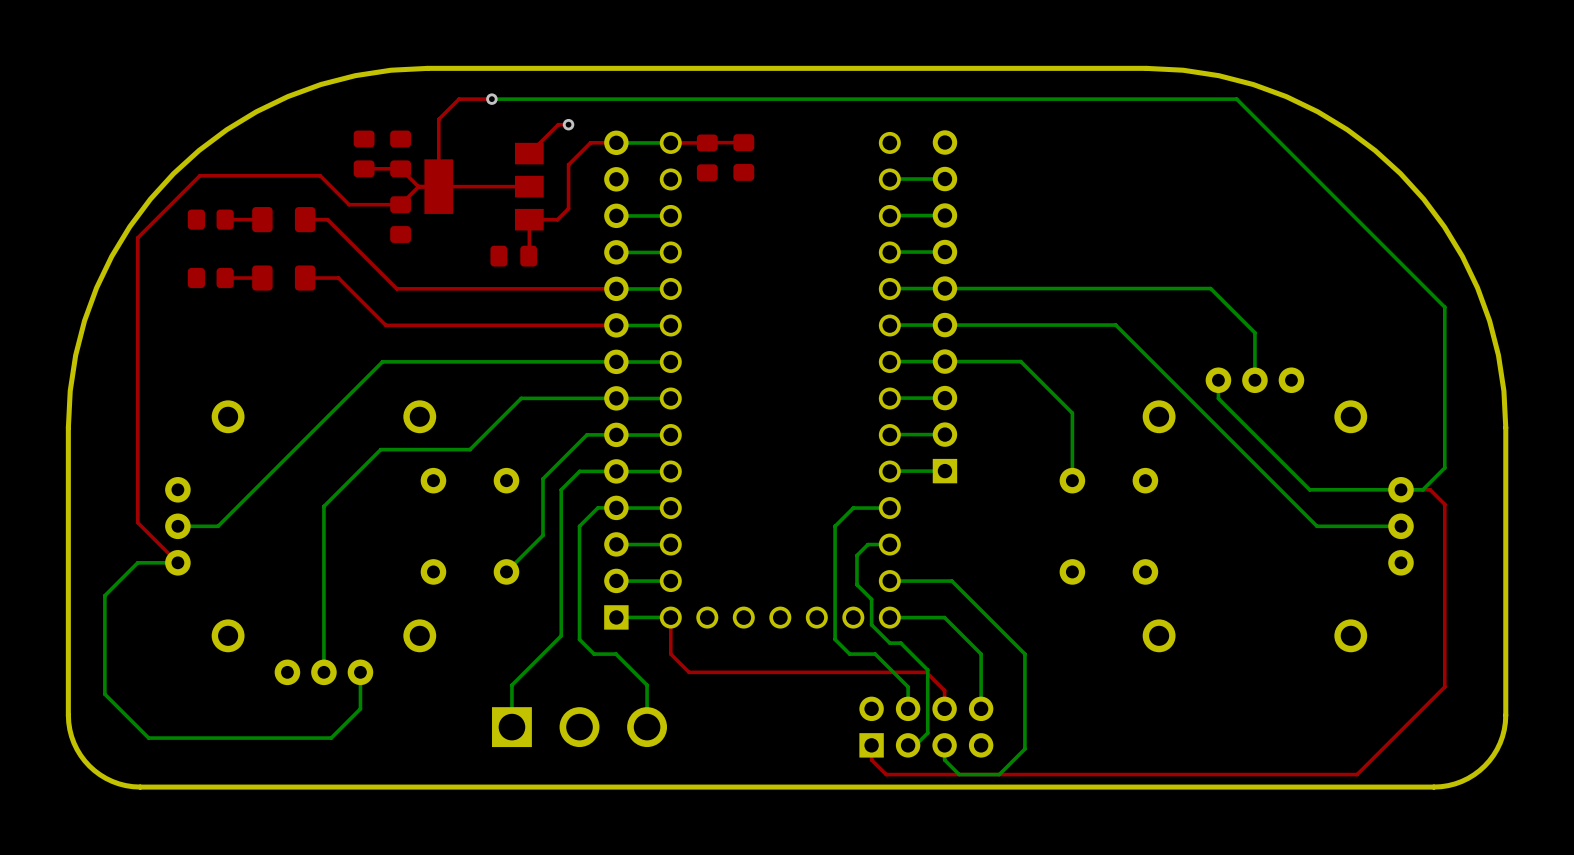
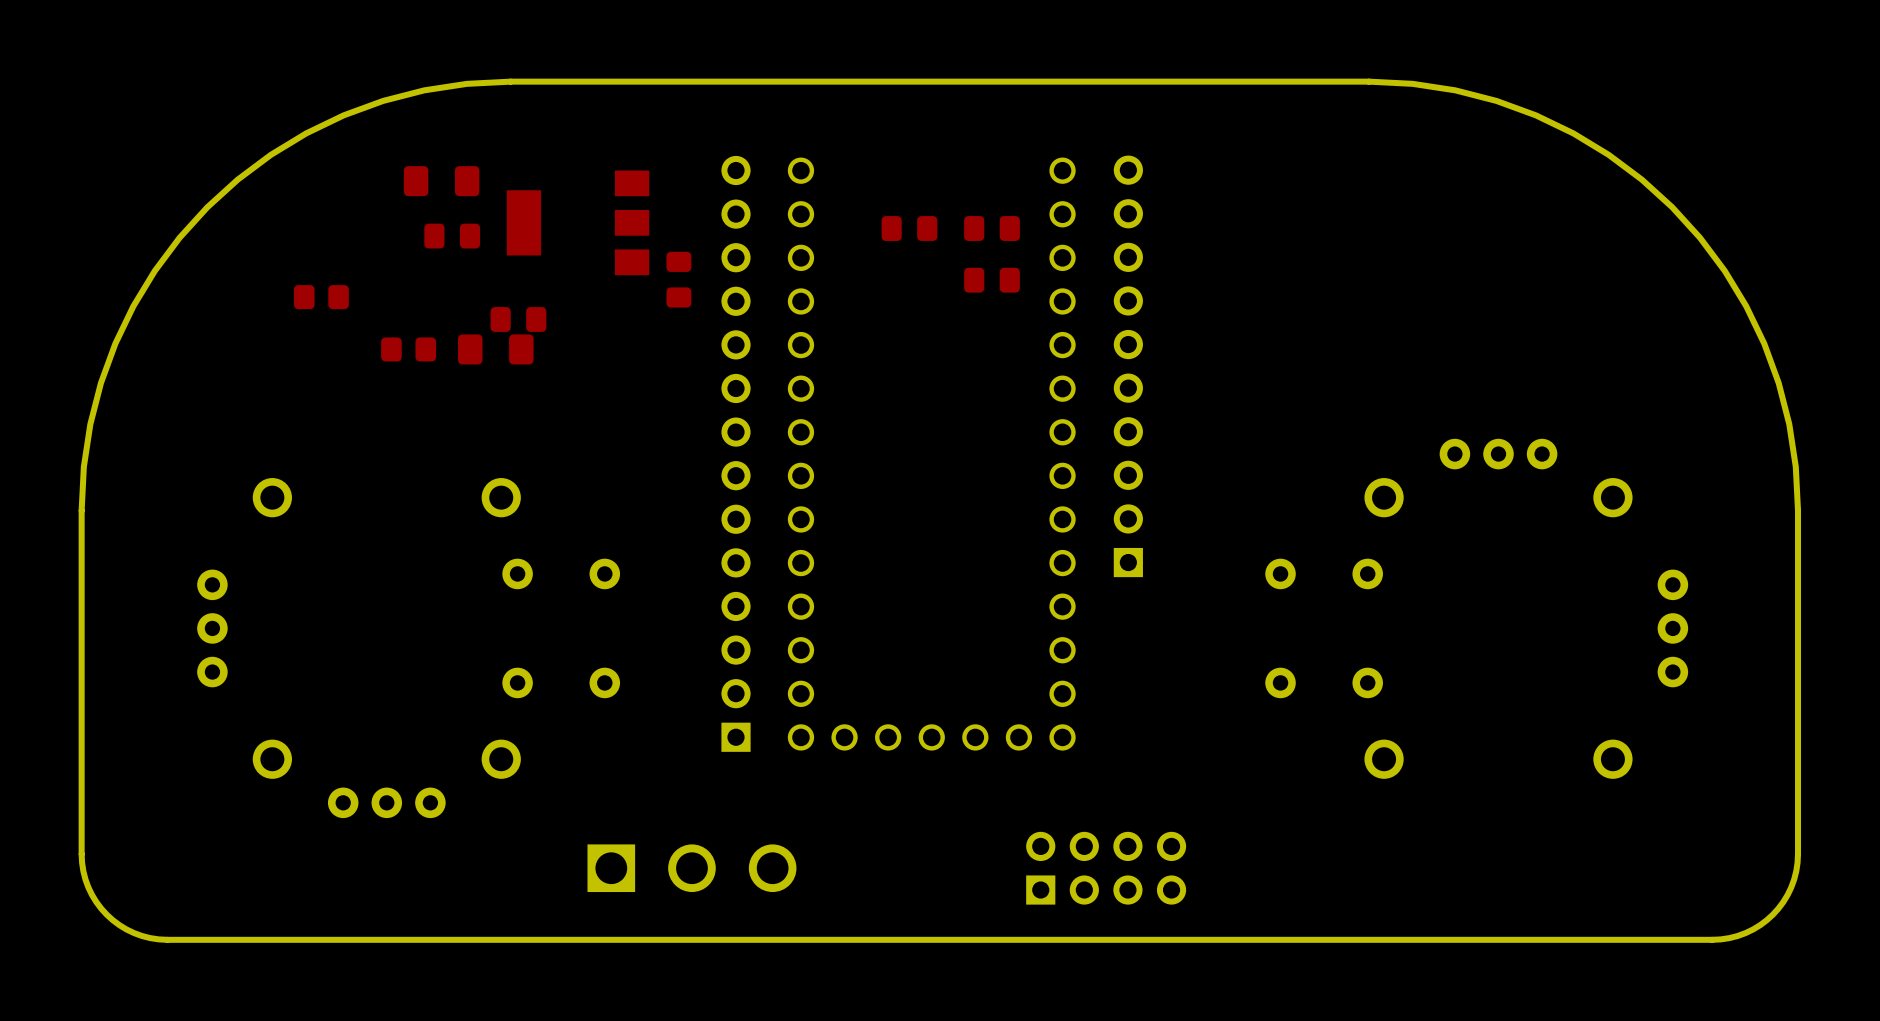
top track: (491, 99) (459, 99) (438, 119) (438, 186) -> none
bottom track: (491, 99) (1236, 99) (1444, 307) (1444, 467) (1422, 489) (1309, 489) (1218, 398) (1218, 380) -> none
via: (491, 99) -> none
top track: (568, 124) (558, 124) (529, 153) -> none
via: (568, 124) -> none
part footprint: [353, 130, 375, 178] -> [403, 166, 480, 197]
top track: (616, 142) (590, 142) (568, 164) (568, 208) (557, 219) (529, 219) (528, 256) -> none
bottom track: (670, 142) (616, 142) -> none
top track: (743, 142) (670, 142) -> none
part: (400, 153) -> none
part: (707, 157) -> none
part: (743, 157) -> none
top track: (364, 168) (400, 168) (418, 186) (529, 186) -> none
bottom track: (944, 179) (889, 179) -> none
top track: (418, 186) (400, 204) (349, 204) (320, 175) (199, 175) (137, 237) (137, 522) (177, 562) -> none
part: none -> (909, 228)
part: none -> (992, 228)
part: none -> (452, 236)
bottom track: (670, 215) (616, 215) -> none
bottom track: (944, 215) (889, 215) -> none
part: (210, 219) -> none
top track: (262, 219) (225, 219) -> none
part: (283, 219) -> none
top track: (305, 219) (327, 219) (396, 288) (616, 288) -> none
part: (400, 219) -> none
part: none -> (678, 279)
part: none -> (992, 280)
part: none -> (321, 297)
bottom track: (670, 252) (616, 252) -> none
bottom track: (944, 252) (889, 252) -> none
part: (513, 256) -> none
part: none -> (518, 319)
part: (210, 278) -> none
top track: (262, 278) (225, 278) -> none
part: (283, 278) -> none
top track: (305, 278) (338, 278) (385, 325) (616, 325) -> none
bottom track: (670, 288) (616, 288) -> none
bottom track: (889, 288) (1210, 288) (1254, 332) (1254, 380) -> none
part: none -> (408, 349)
part: none -> (495, 349)
bottom track: (670, 325) (616, 325) -> none
bottom track: (889, 325) (1115, 325) (1317, 526) (1400, 526) -> none
bottom track: (616, 361) (382, 361) (218, 526) (177, 526) -> none
bottom track: (670, 362) (616, 362) -> none
bottom track: (889, 362) (1020, 361) (1072, 413) (1072, 480) -> none
bottom track: (616, 398) (521, 398) (469, 449) (380, 449) (323, 506) (323, 672) -> none
bottom track: (670, 398) (616, 398) -> none
bottom track: (944, 398) (889, 398) -> none
bottom track: (616, 434) (586, 434) (543, 478) (543, 535) (506, 571) -> none
bottom track: (944, 434) (889, 435) -> none
bottom track: (670, 435) (616, 435) -> none
bottom track: (616, 471) (579, 471) (561, 489) (561, 635) (511, 685) (511, 727) -> none
bottom track: (670, 471) (616, 471) -> none
bottom track: (944, 471) (889, 471) -> none
top track: (1400, 489) (1430, 489) (1444, 504) (1444, 686) (1357, 774) (886, 774) (871, 759) (871, 745) -> none
bottom track: (616, 507) (597, 507) (579, 526) (579, 639) (594, 654) (616, 654) (647, 685) (647, 727) -> none
bottom track: (670, 508) (616, 508) -> none
bottom track: (889, 508) (853, 508) (835, 526) (835, 639) (849, 654) (875, 654) (908, 686) (908, 708) -> none
bottom track: (670, 544) (616, 544) -> none
bottom track: (889, 544) (867, 544) (856, 555) (856, 584) (871, 599) (871, 624) (889, 643) (900, 643) (927, 670) (927, 733) (915, 745) (908, 745) -> none
bottom track: (177, 562) (137, 562) (104, 595) (104, 694) (148, 738) (331, 738) (360, 708) (360, 672) -> none
bottom track: (670, 581) (616, 581) -> none
bottom track: (889, 581) (951, 581) (1024, 654) (1024, 749) (999, 774) (959, 774) (944, 759) (944, 745) -> none
top track: (670, 617) (670, 654) (689, 672) (926, 672) (944, 690) (944, 708) -> none
bottom track: (670, 617) (616, 617) -> none
bottom track: (889, 617) (944, 617) (981, 654) (981, 708) -> none

